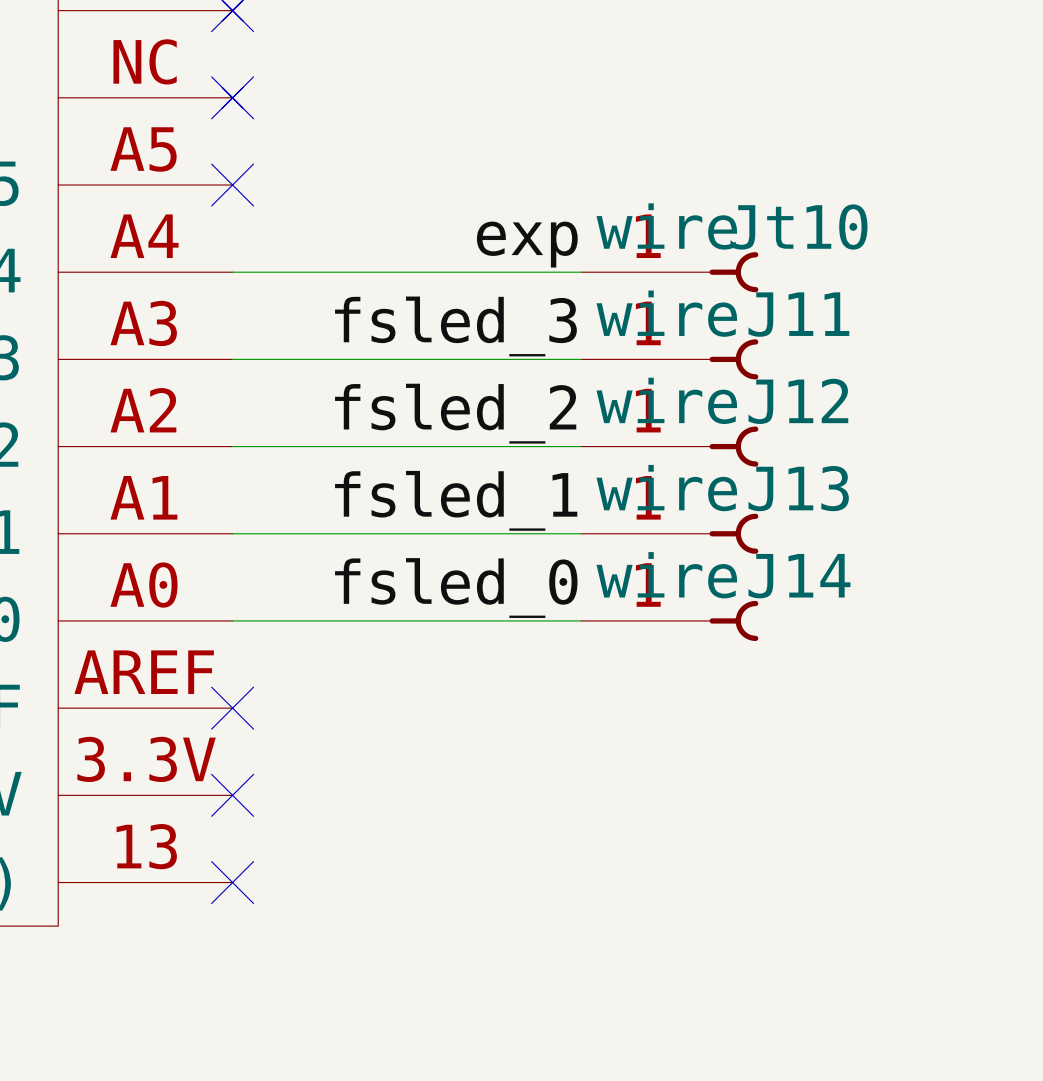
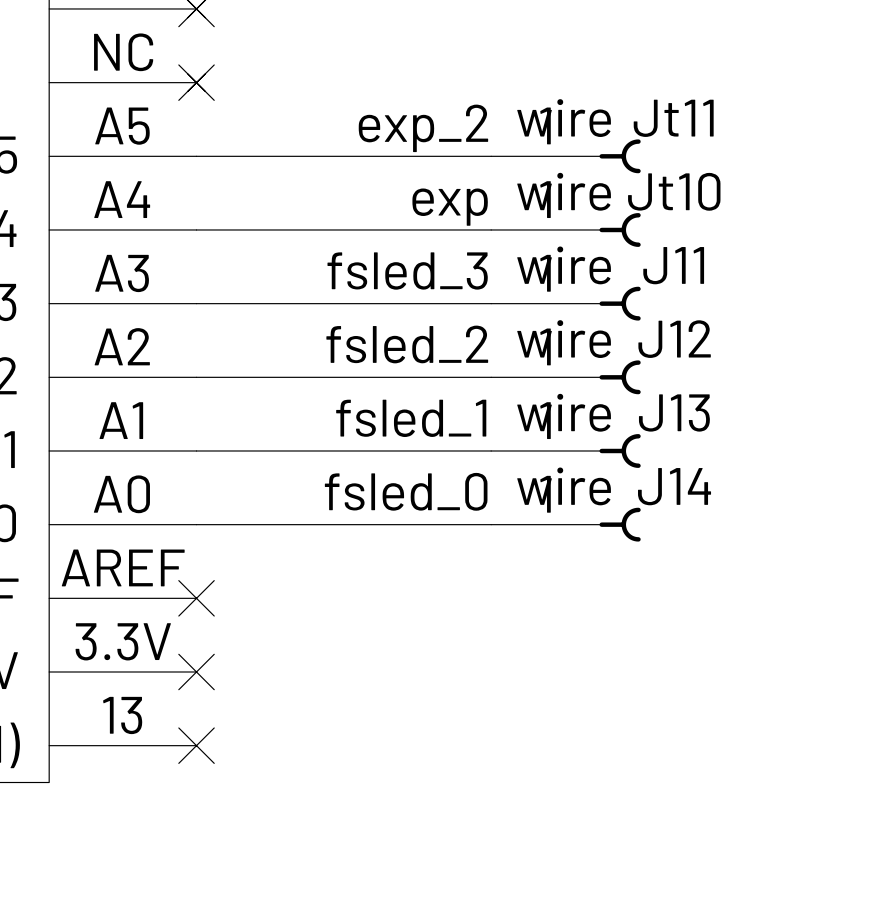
label: none -> exp_2 (423, 128)
wire: none -> (196, 156) (491, 156)
no-connect mark: (232, 185) -> none
Jt11: none -> wire (565, 156)

